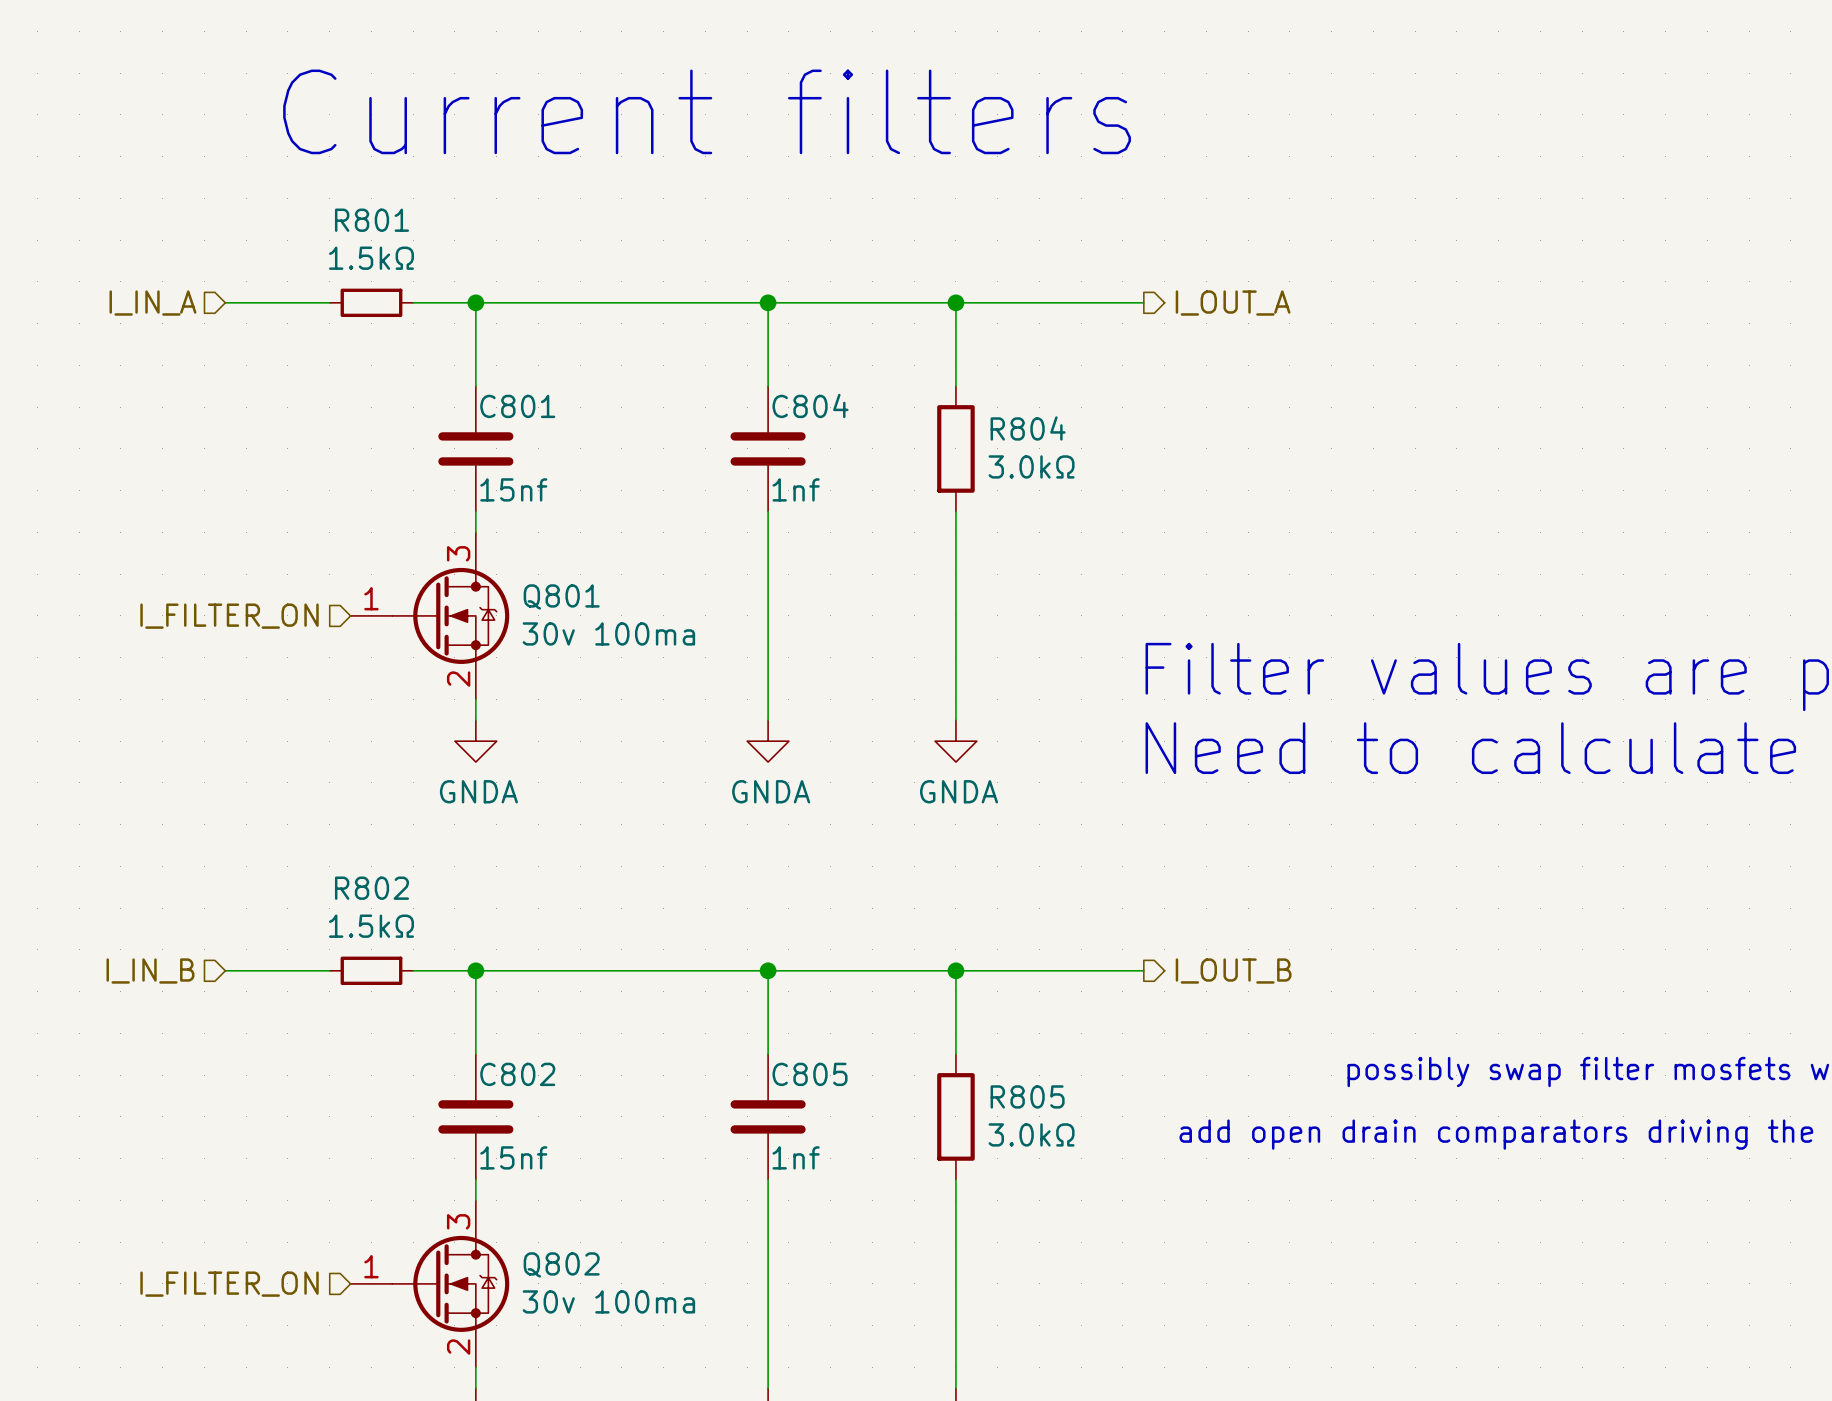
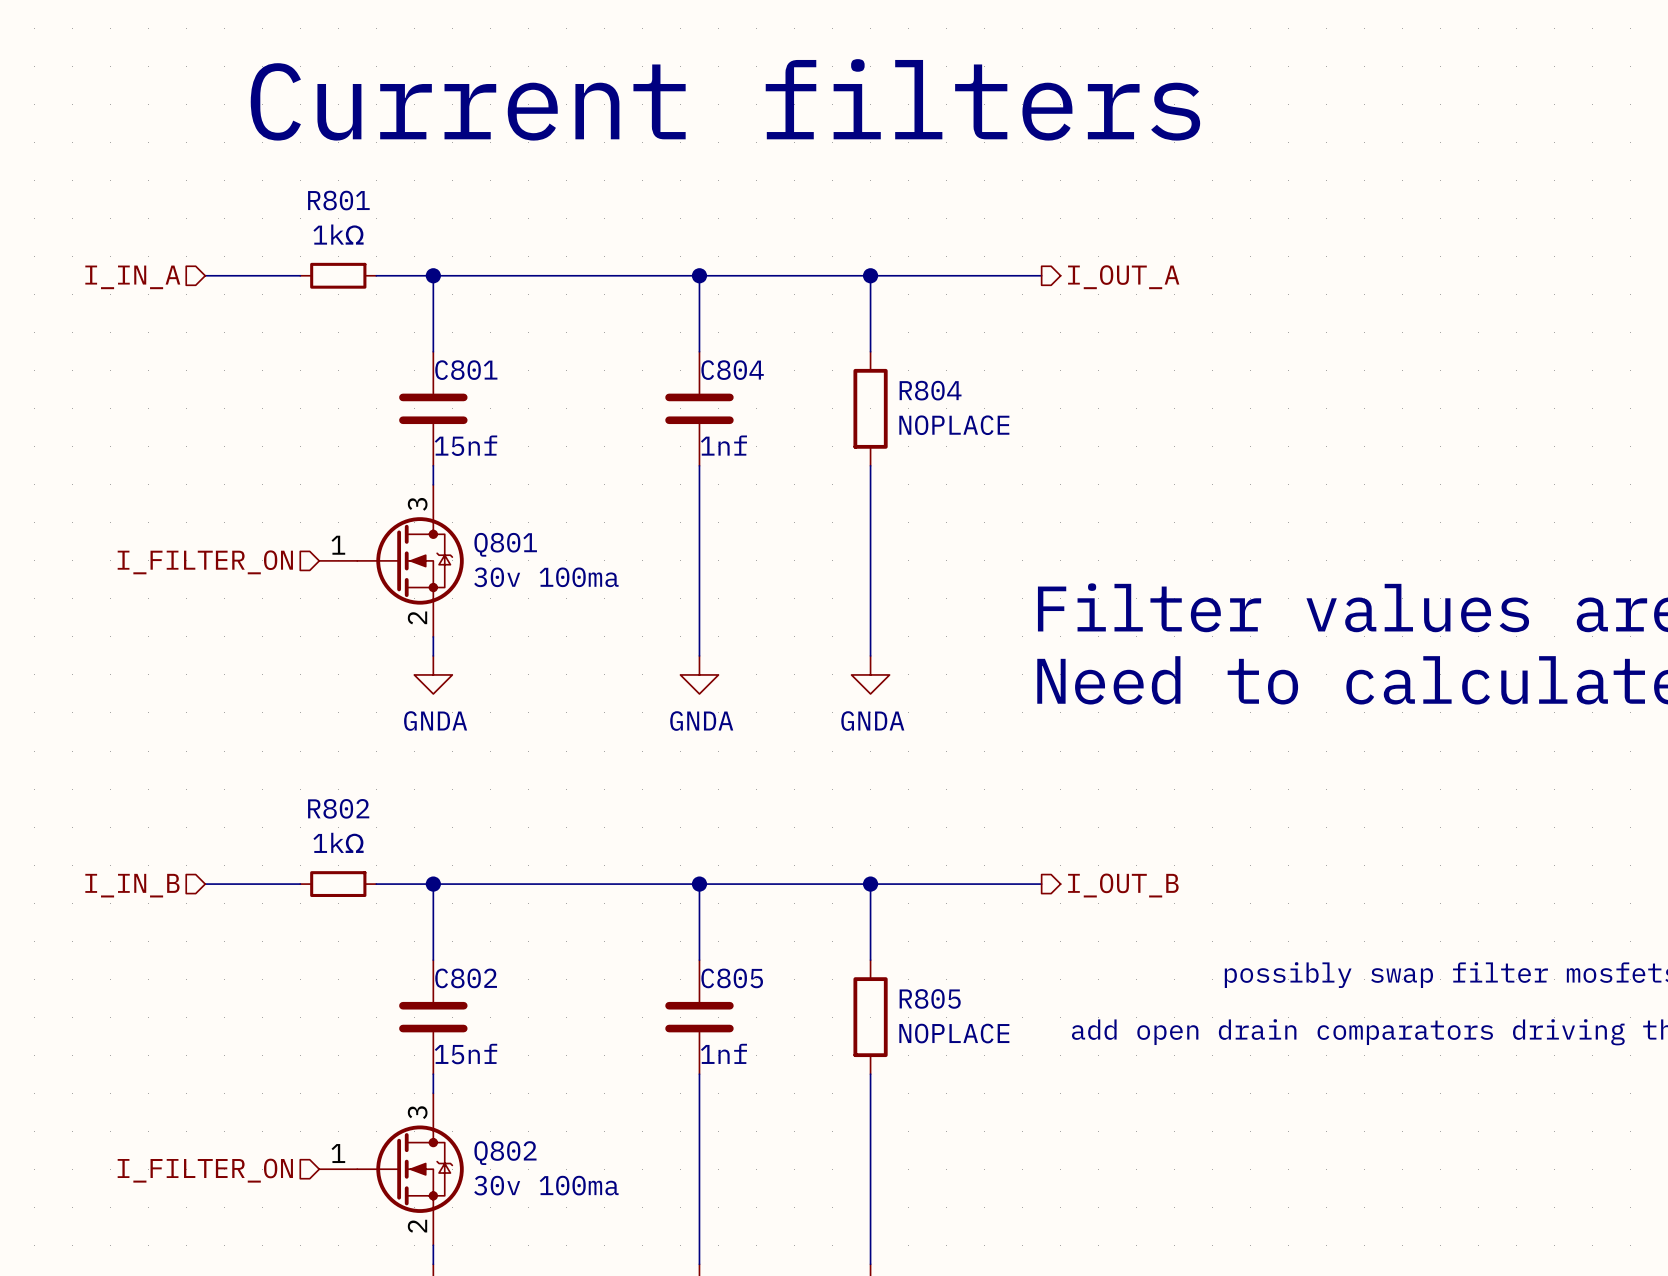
R801 value: 1.5kΩ (371, 258) -> 1kΩ (338, 234)
R804 value: 3.0kΩ (1031, 466) -> NOPLACE (954, 425)
R802 value: 1.5kΩ (371, 926) -> 1kΩ (338, 842)
R805 value: 3.0kΩ (1031, 1134) -> NOPLACE (954, 1033)

